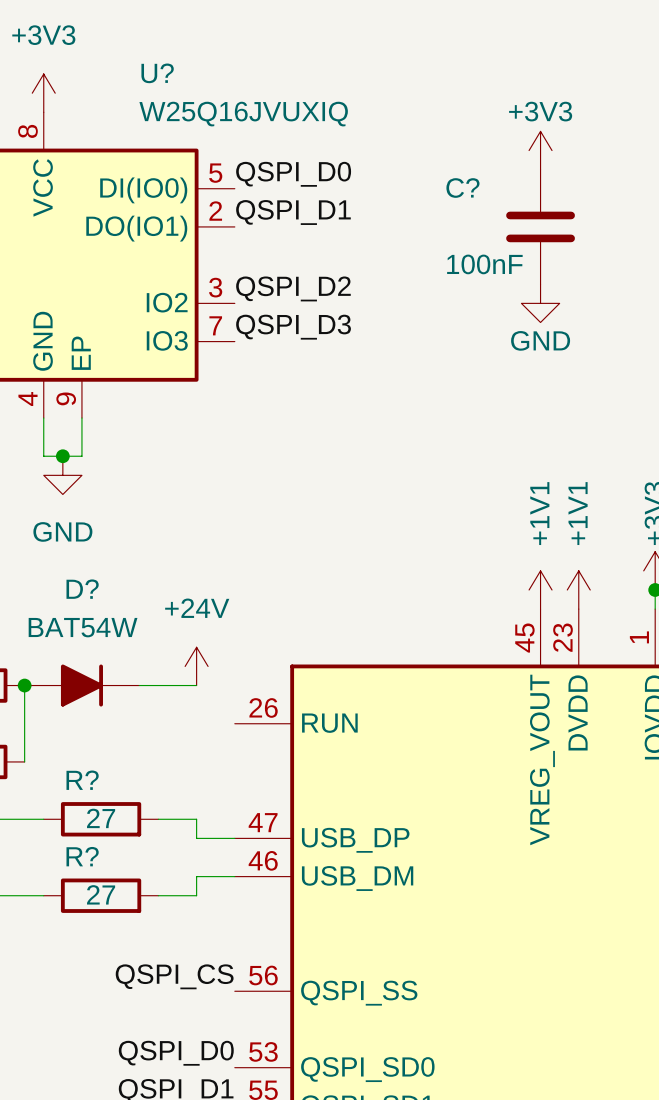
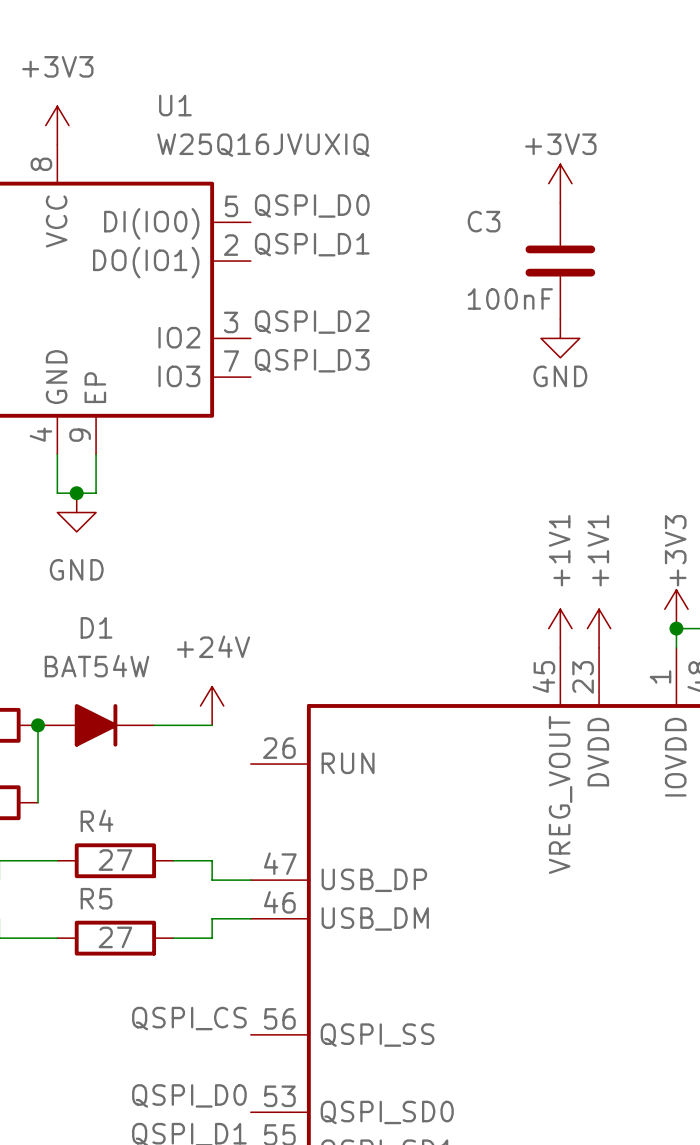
U? name: U? (157, 73) -> U1 (175, 105)
C? name: C? (462, 188) -> C3 (484, 221)
D? name: D? (82, 589) -> D1 (96, 627)
R? name: R? (82, 780) -> R4 (96, 820)
R? name: R? (82, 856) -> R5 (96, 898)

